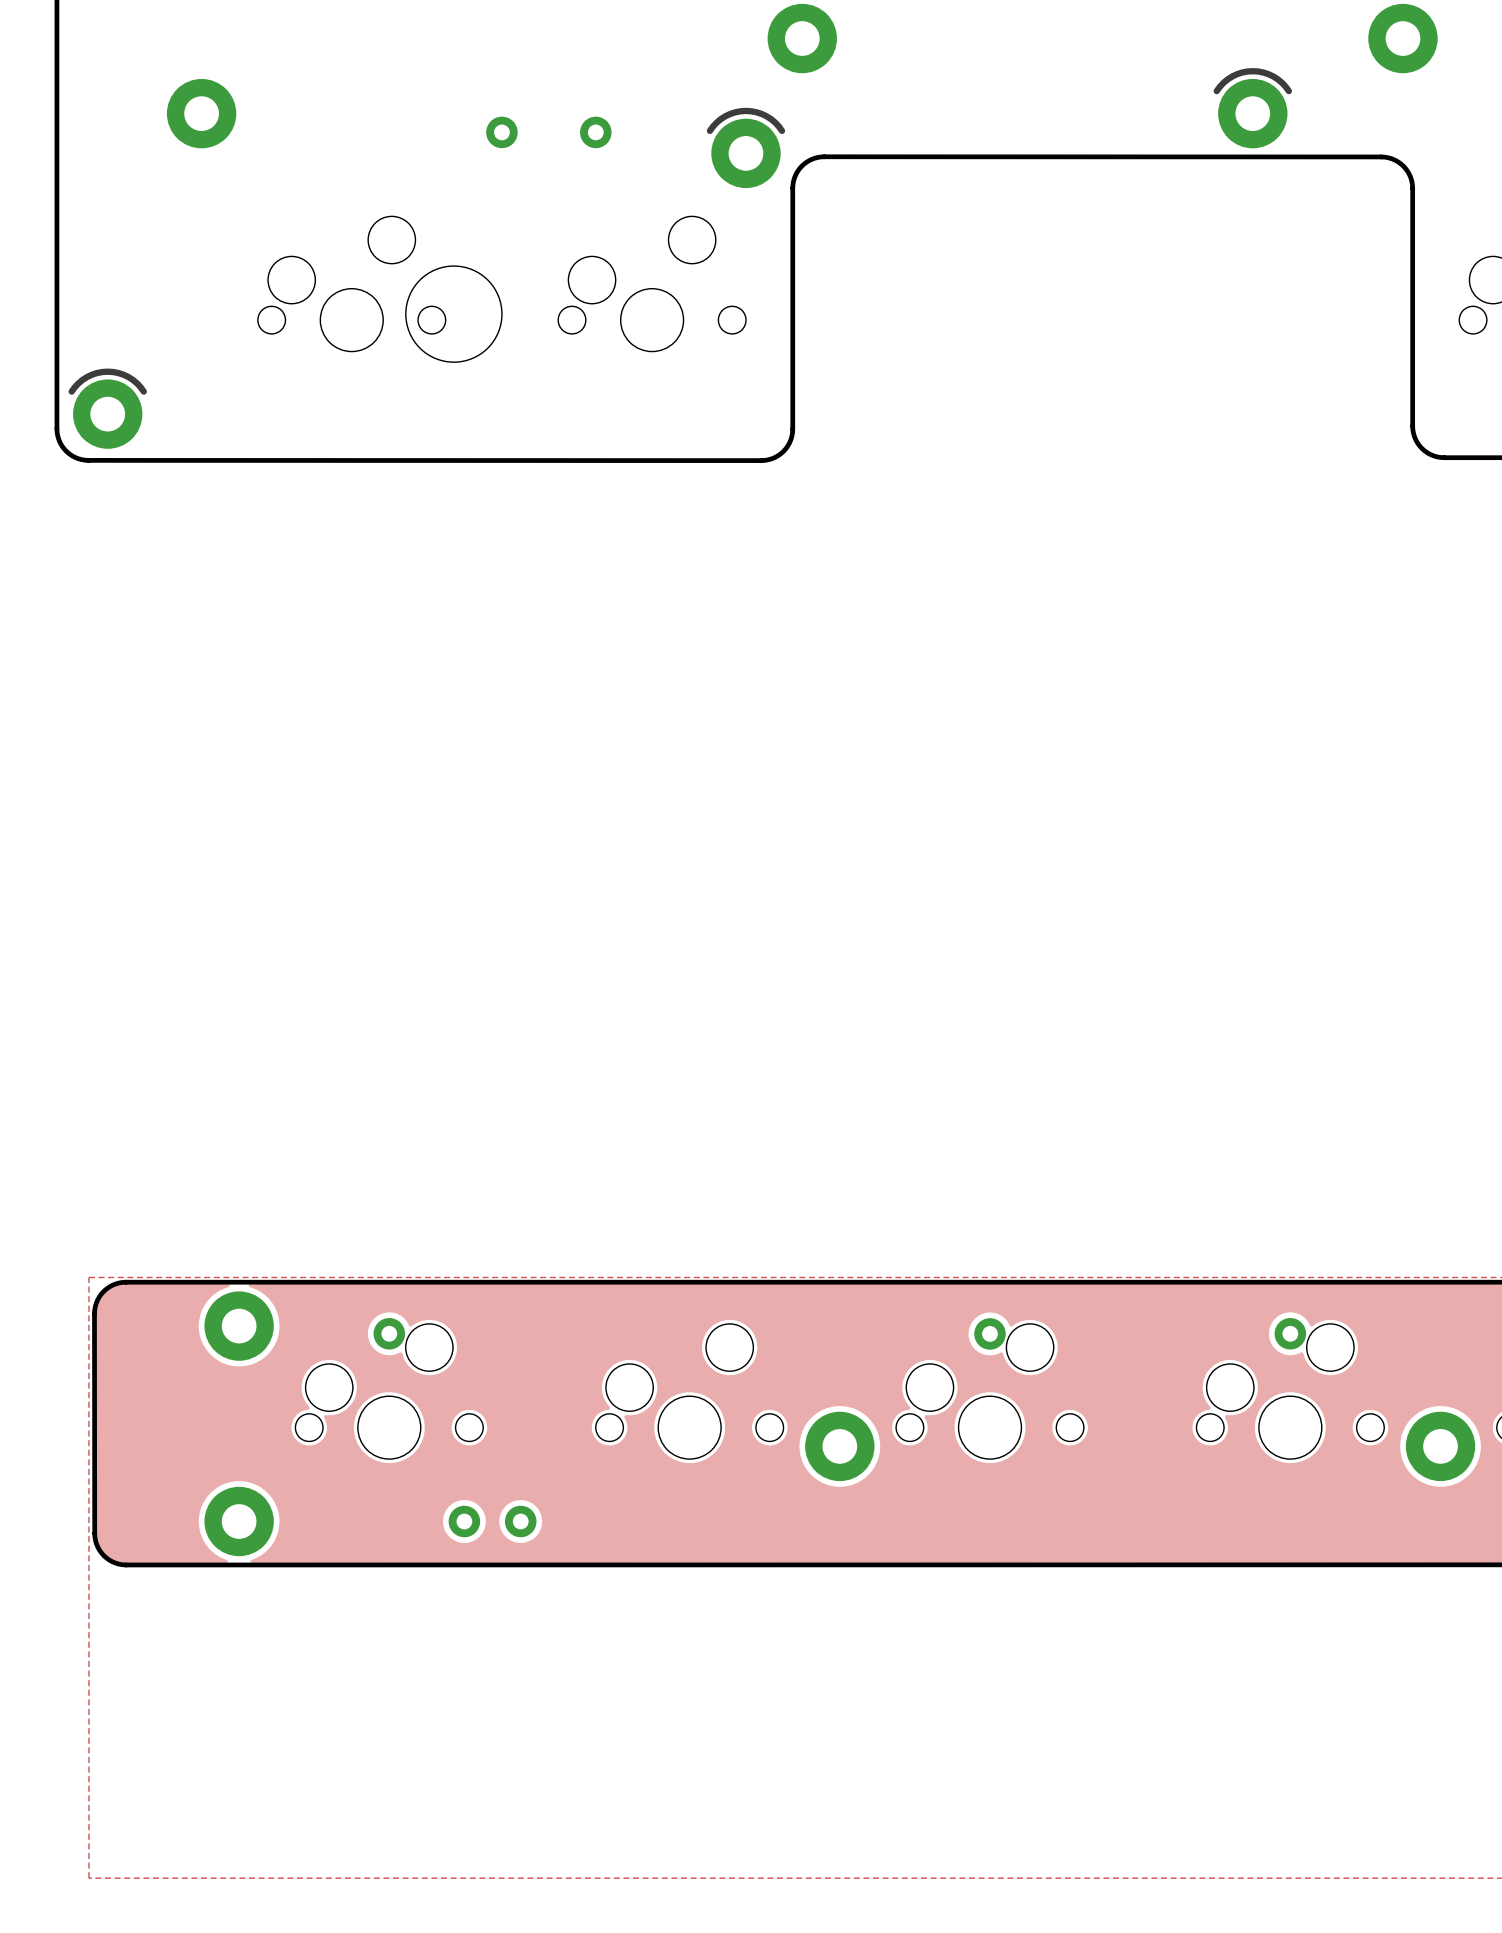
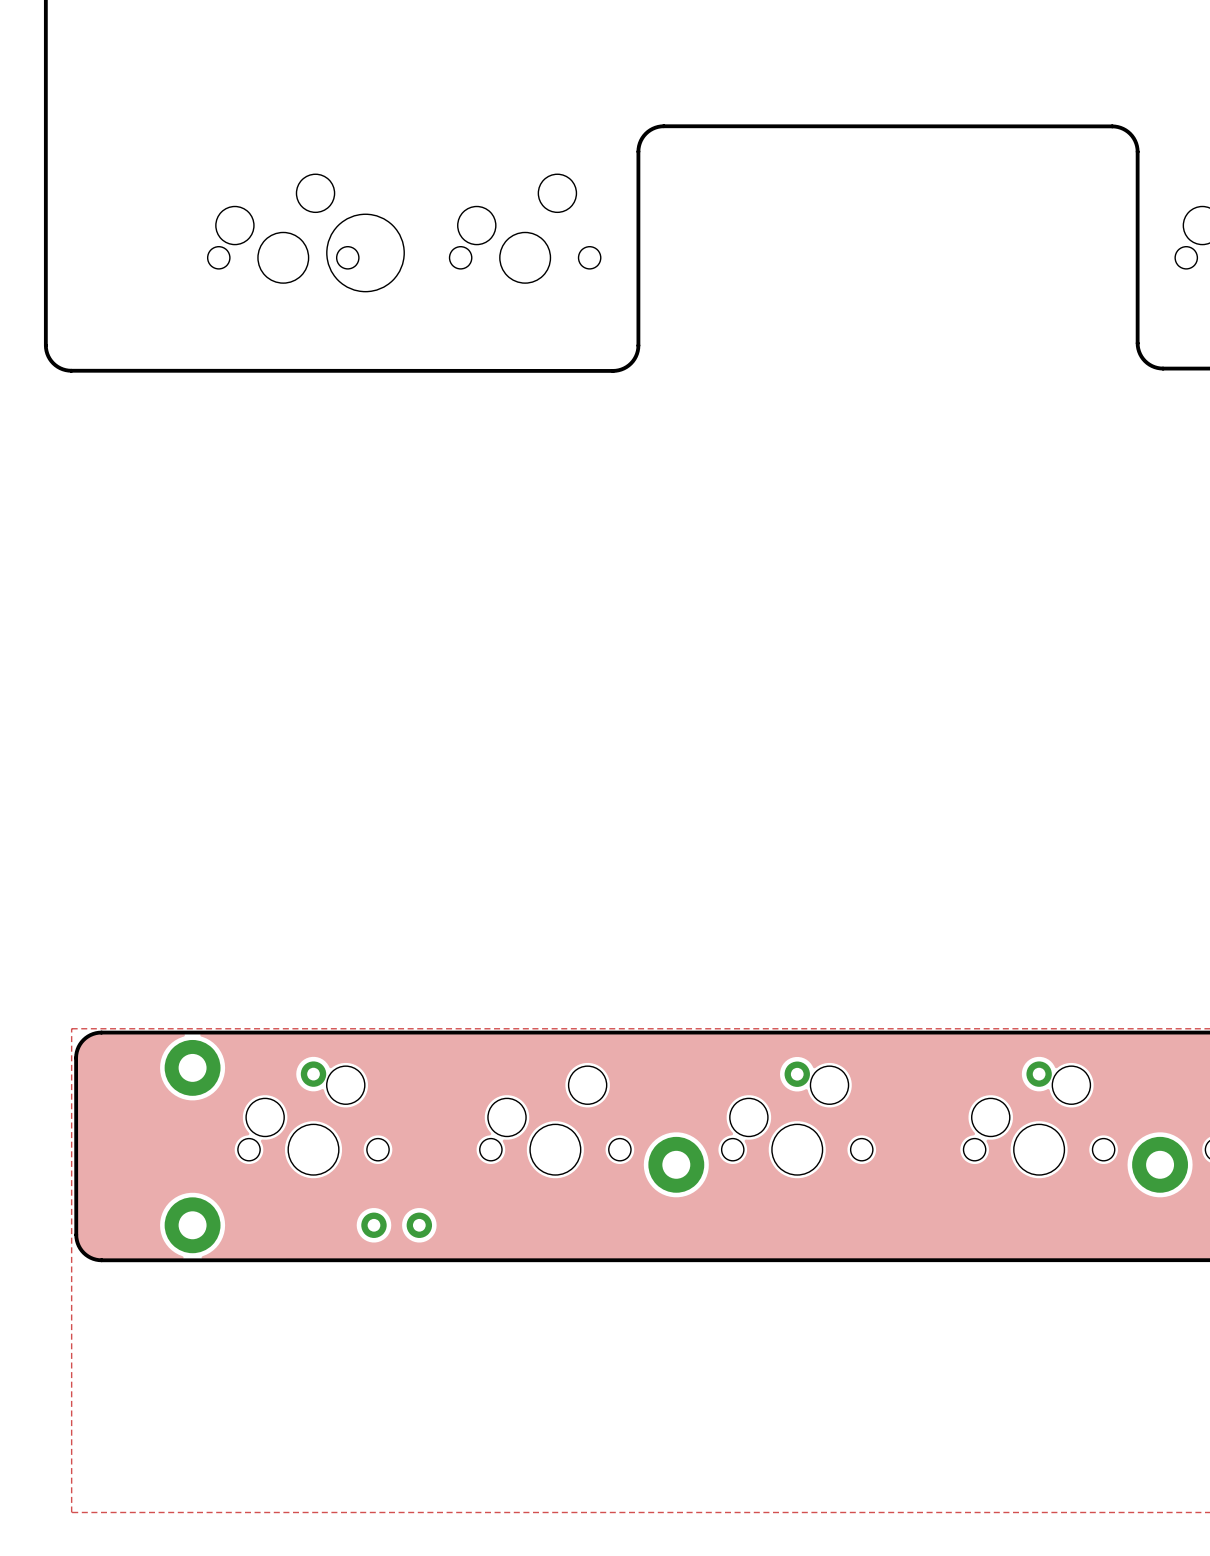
part: (802, 38) -> none
part: (1402, 38) -> none
part: (1252, 108) -> none
part: (201, 113) -> none
part: (501, 132) -> none
part: (595, 132) -> none
part: (745, 147) -> none
part: (107, 408) -> none

